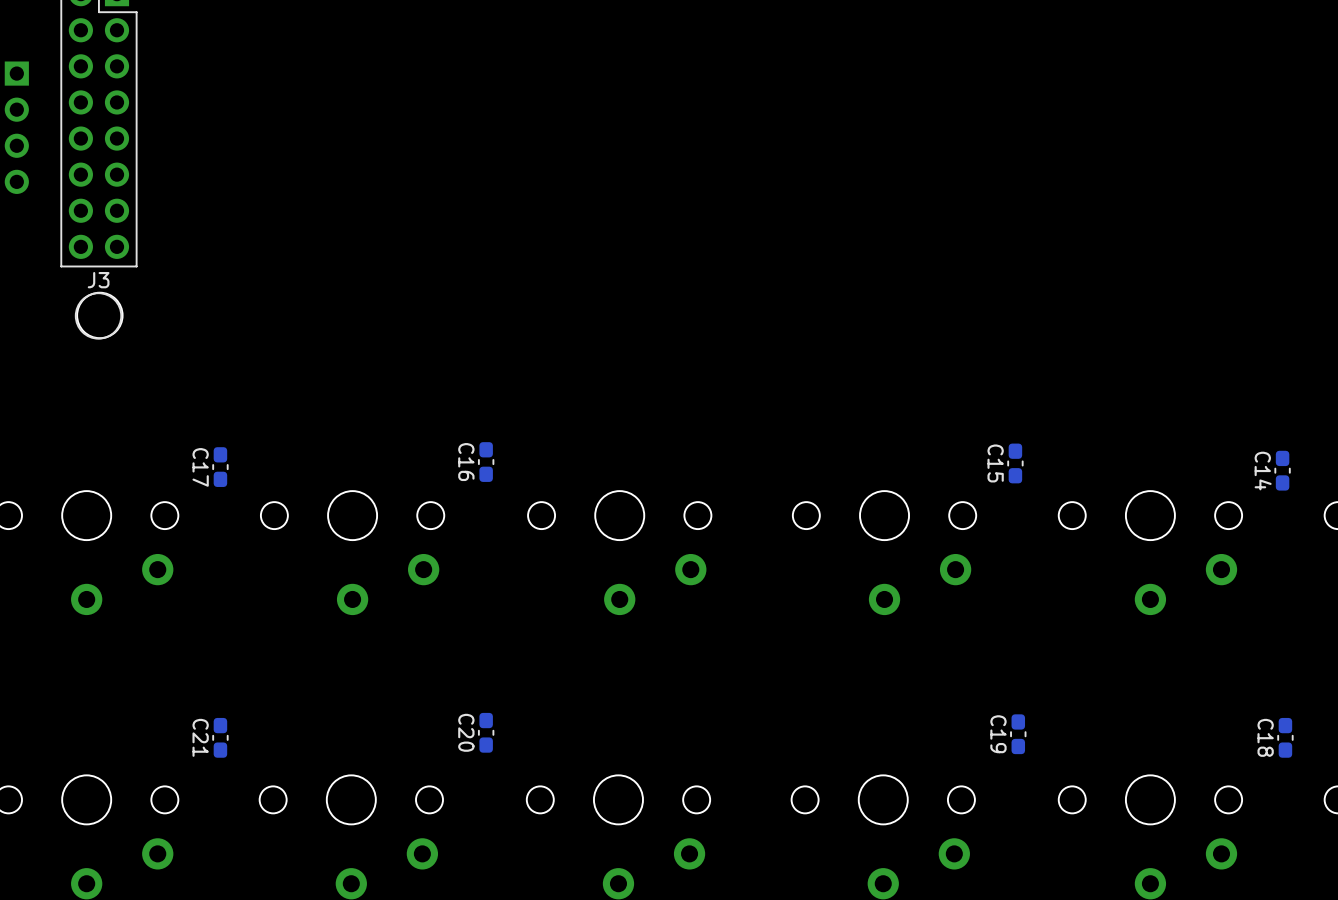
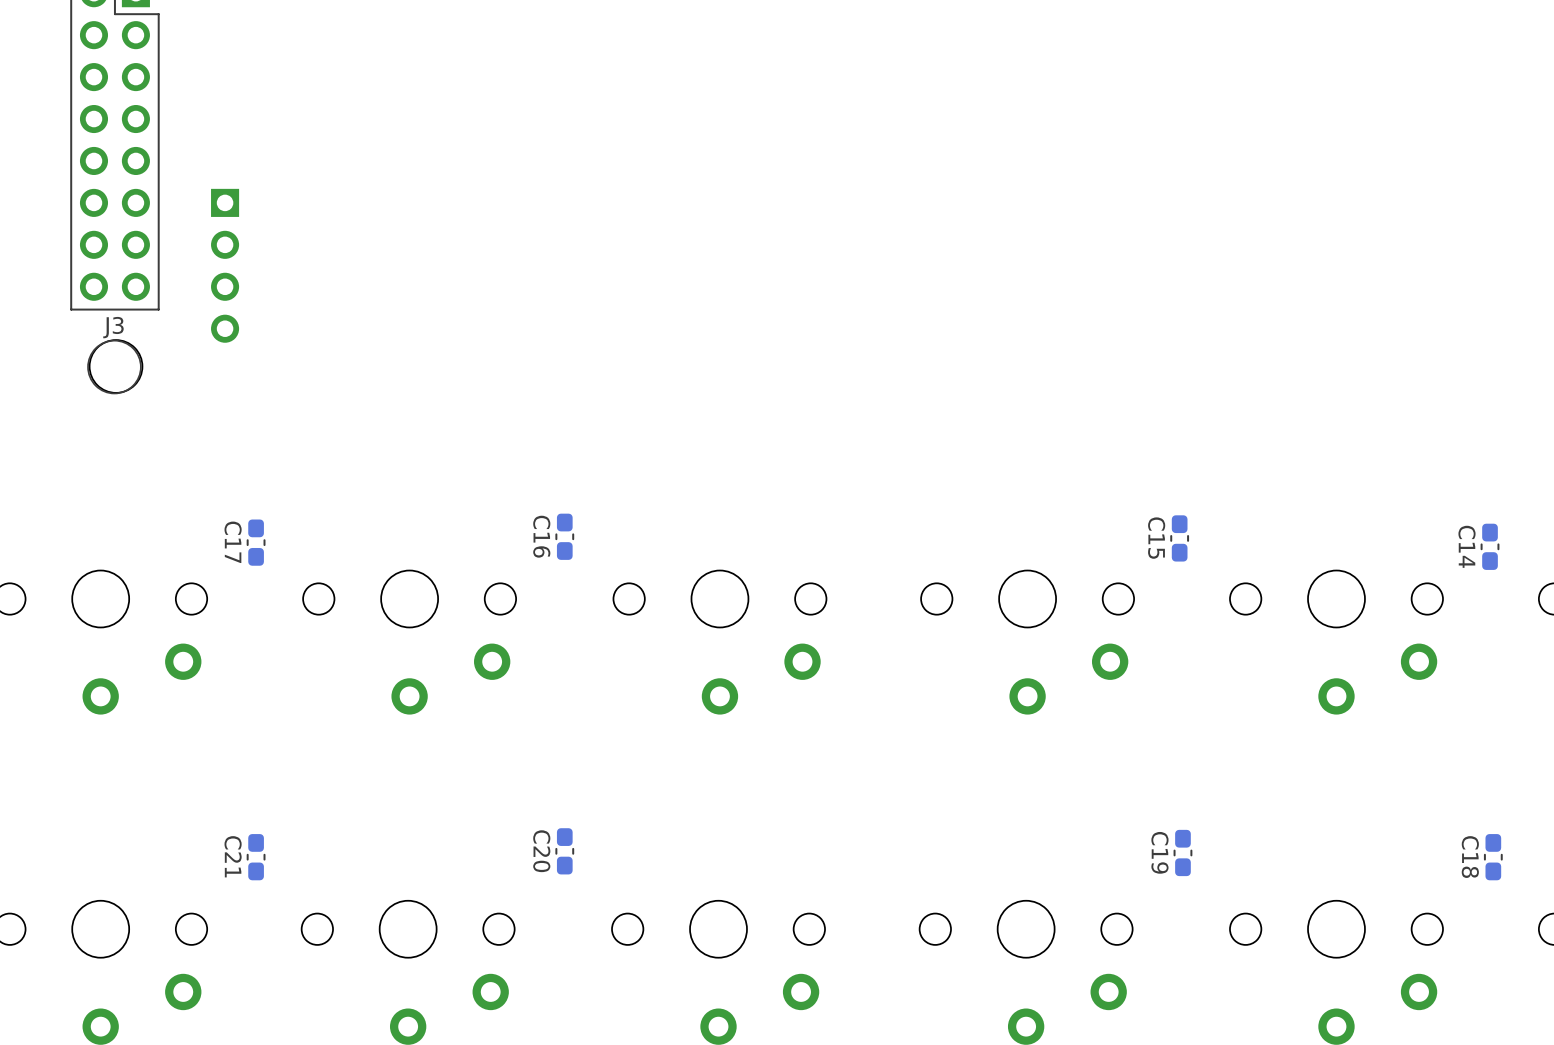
part position: (16, 127) -> (225, 265)

